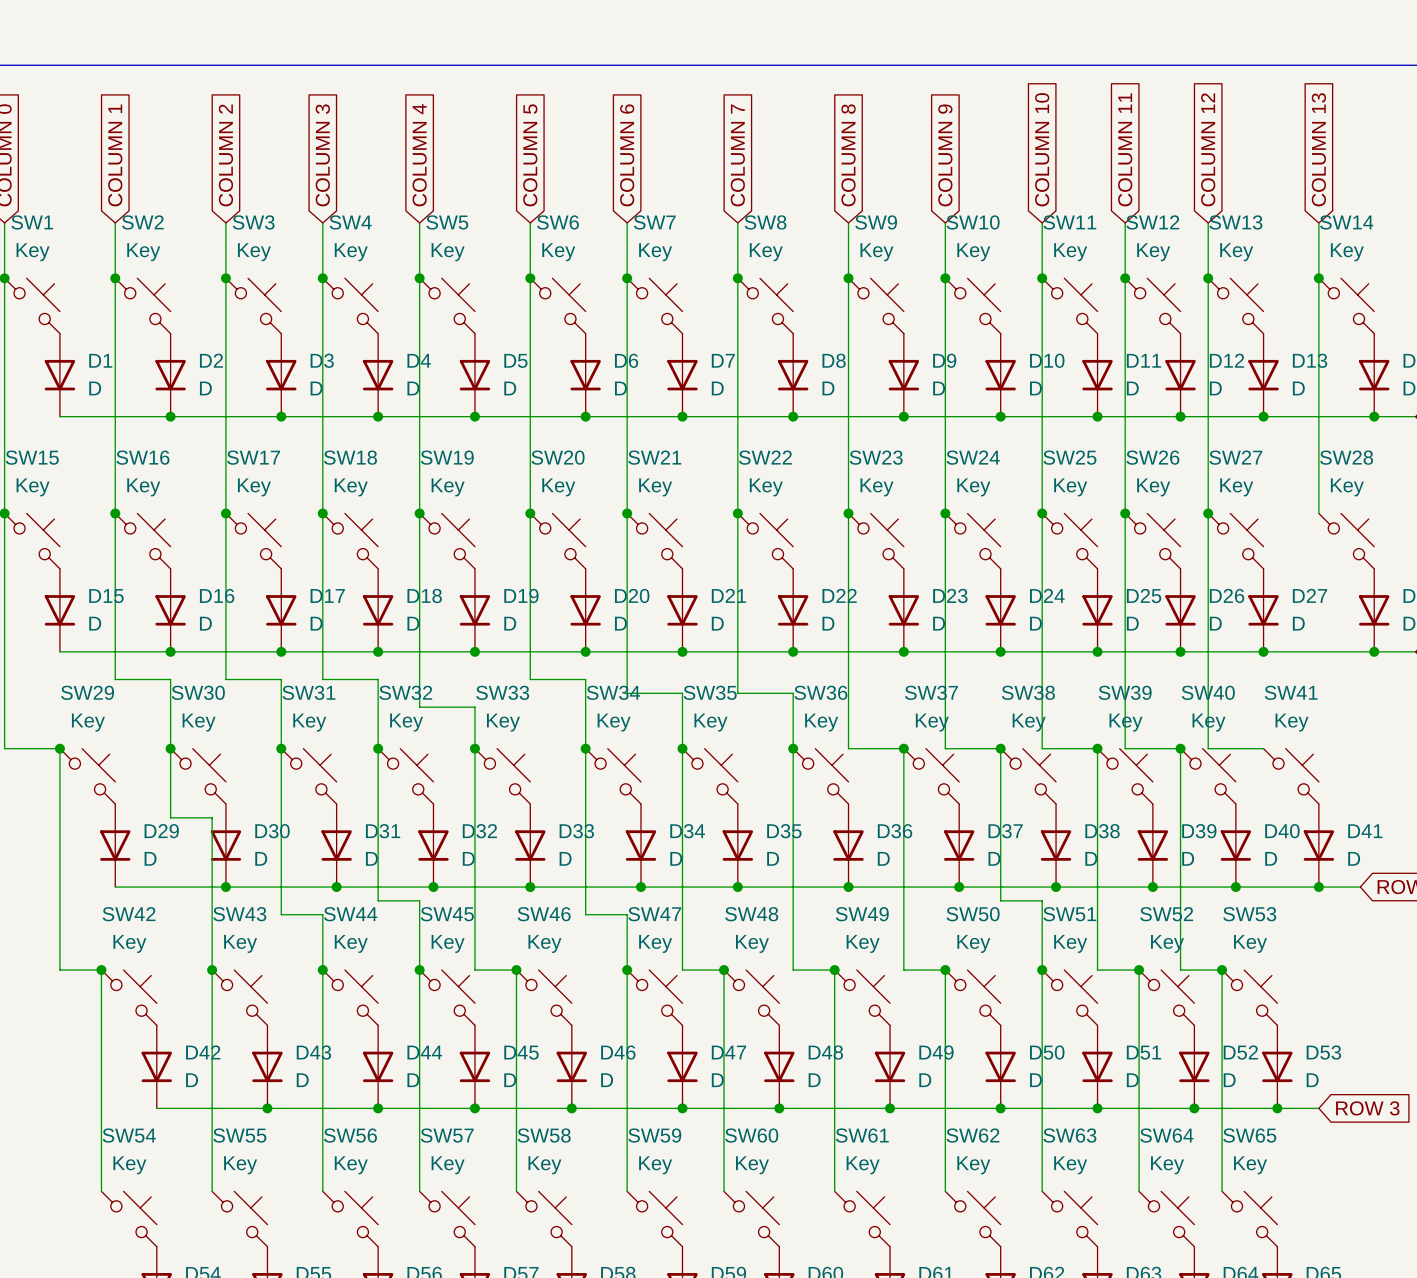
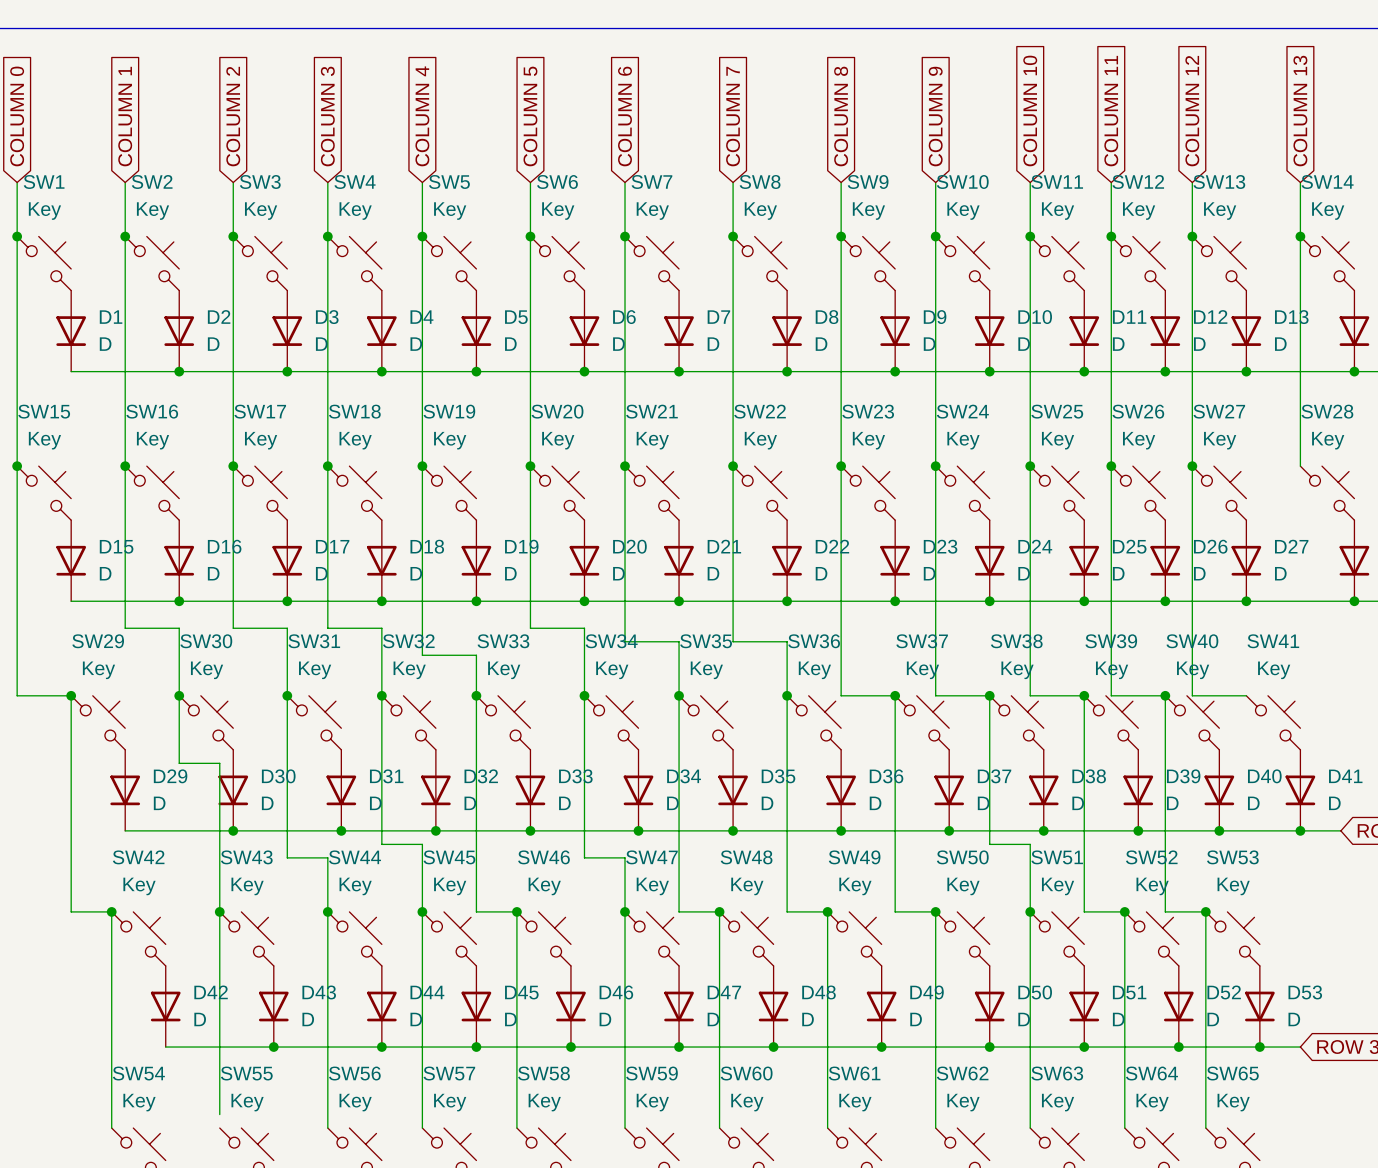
wire: (212, 1177) (212, 1191) -> none

